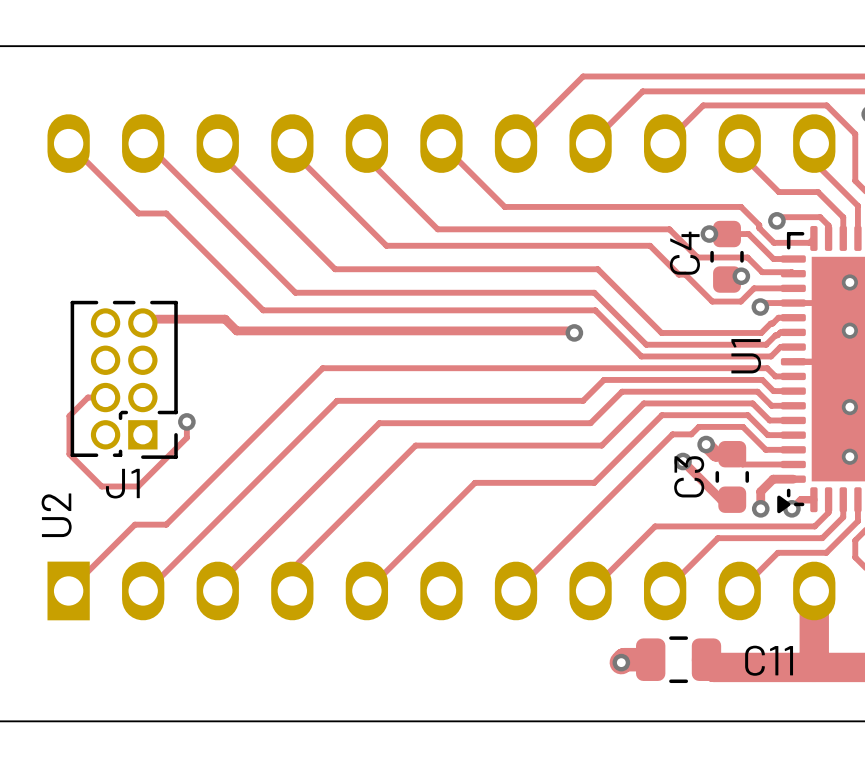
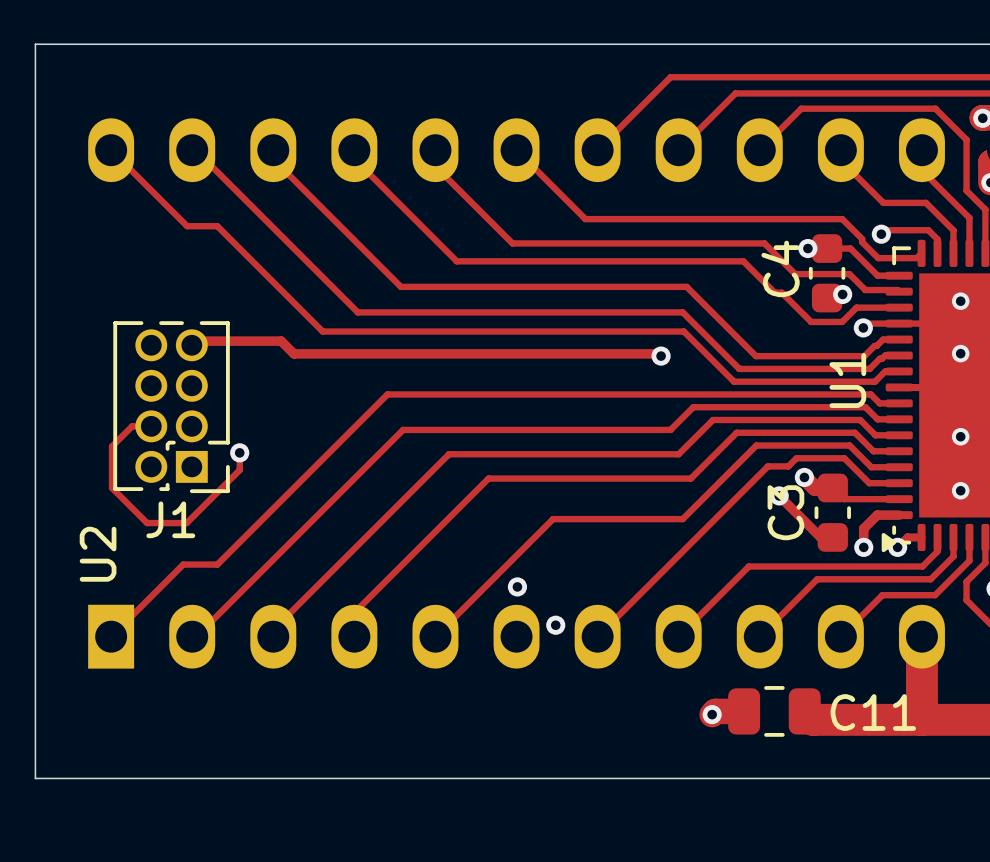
via: none -> (517, 586)
via: none -> (555, 625)

